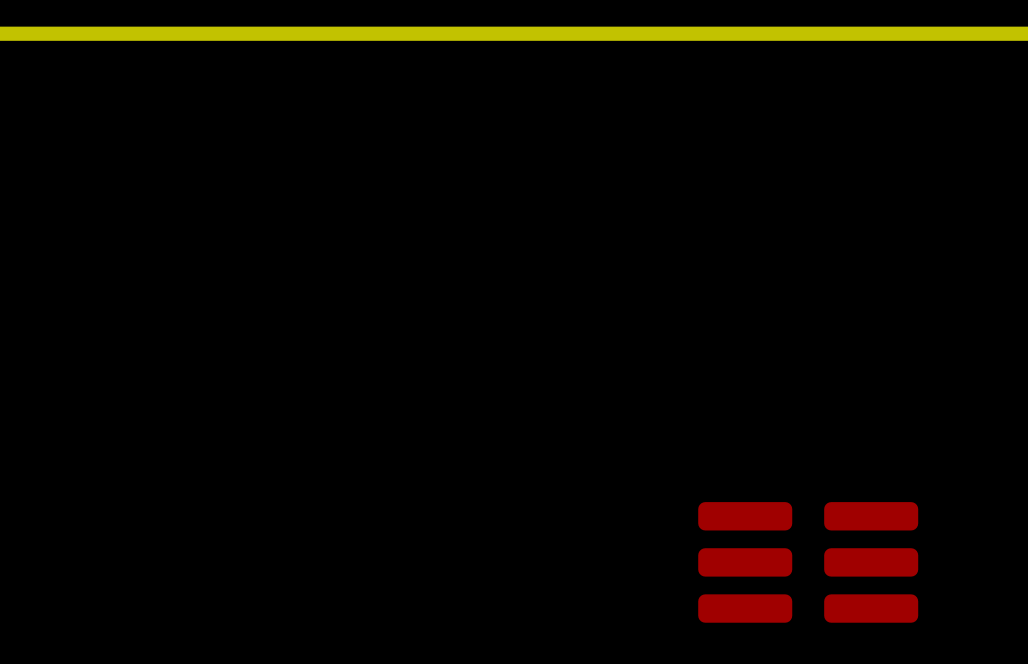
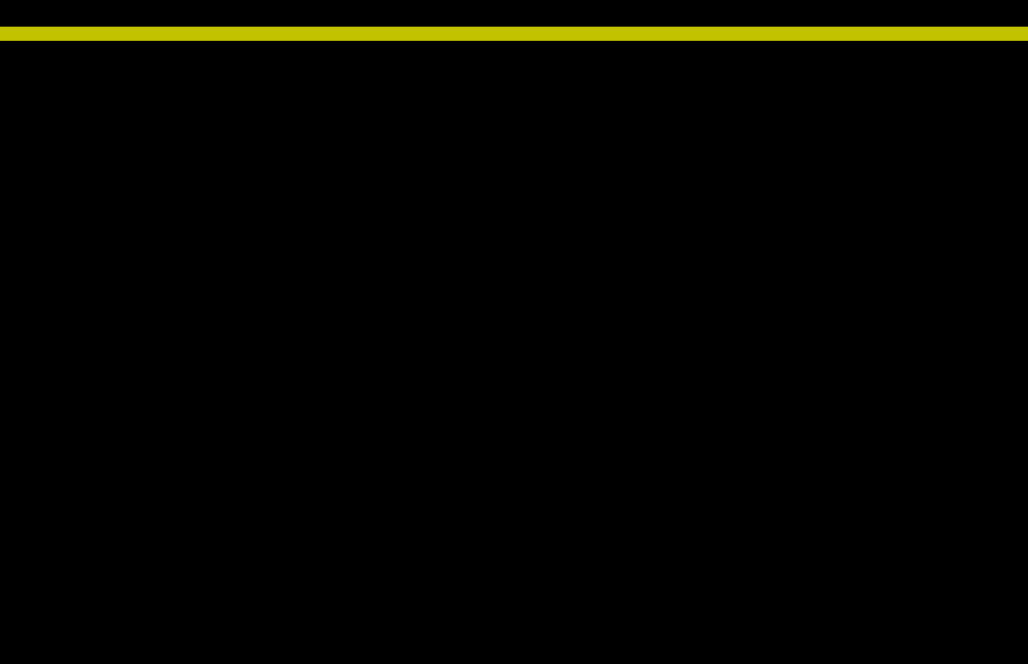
part: (808, 562) -> none

